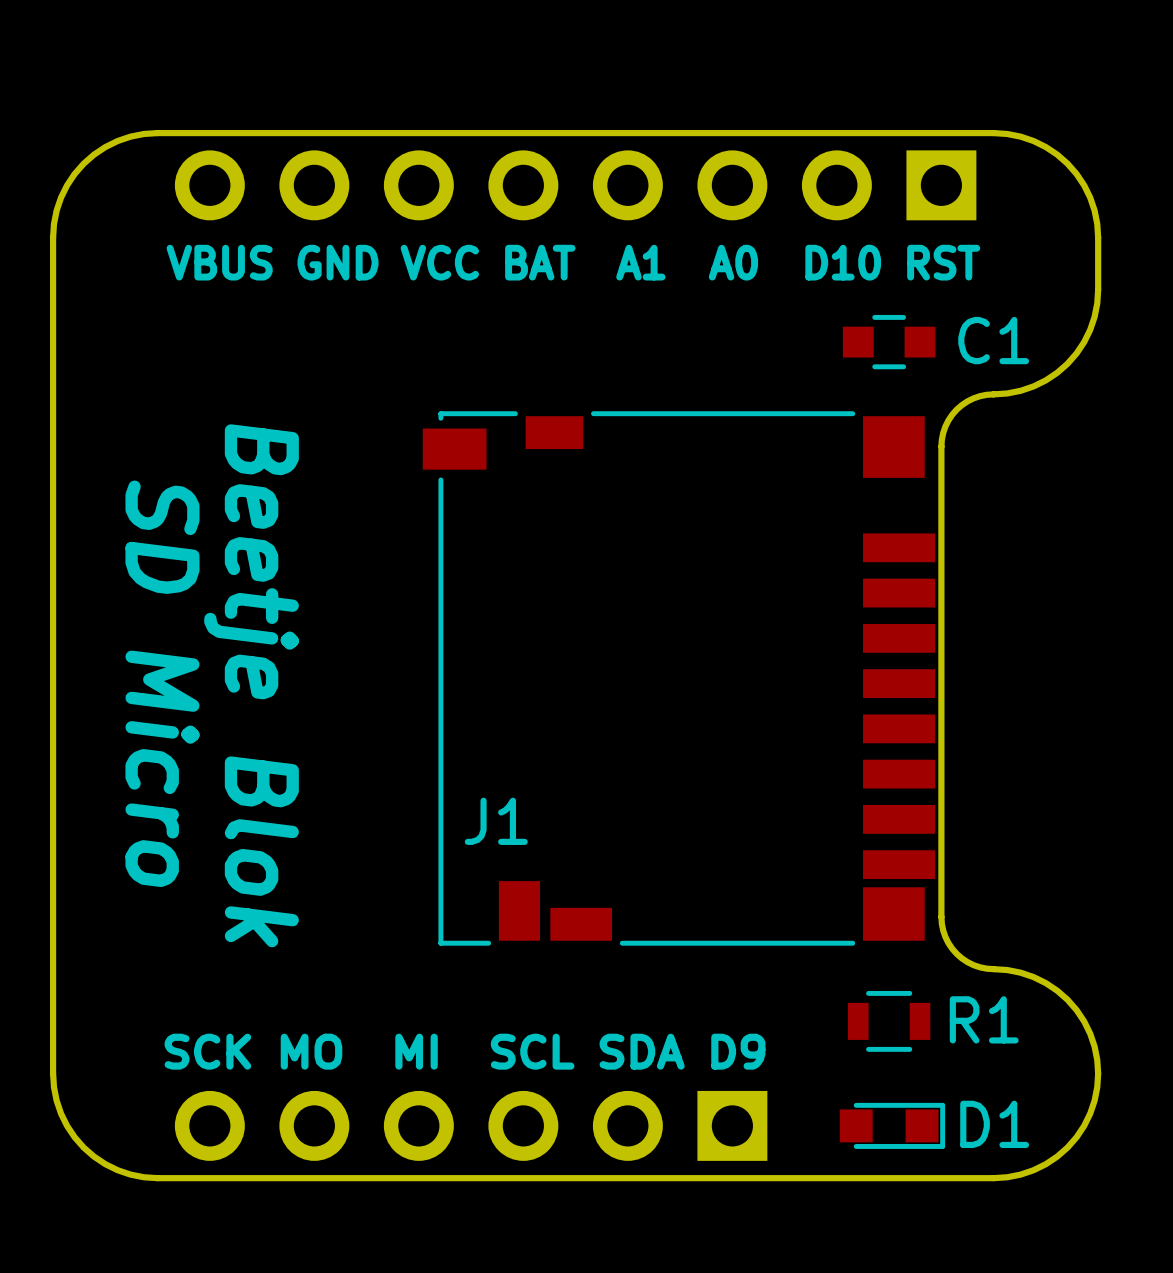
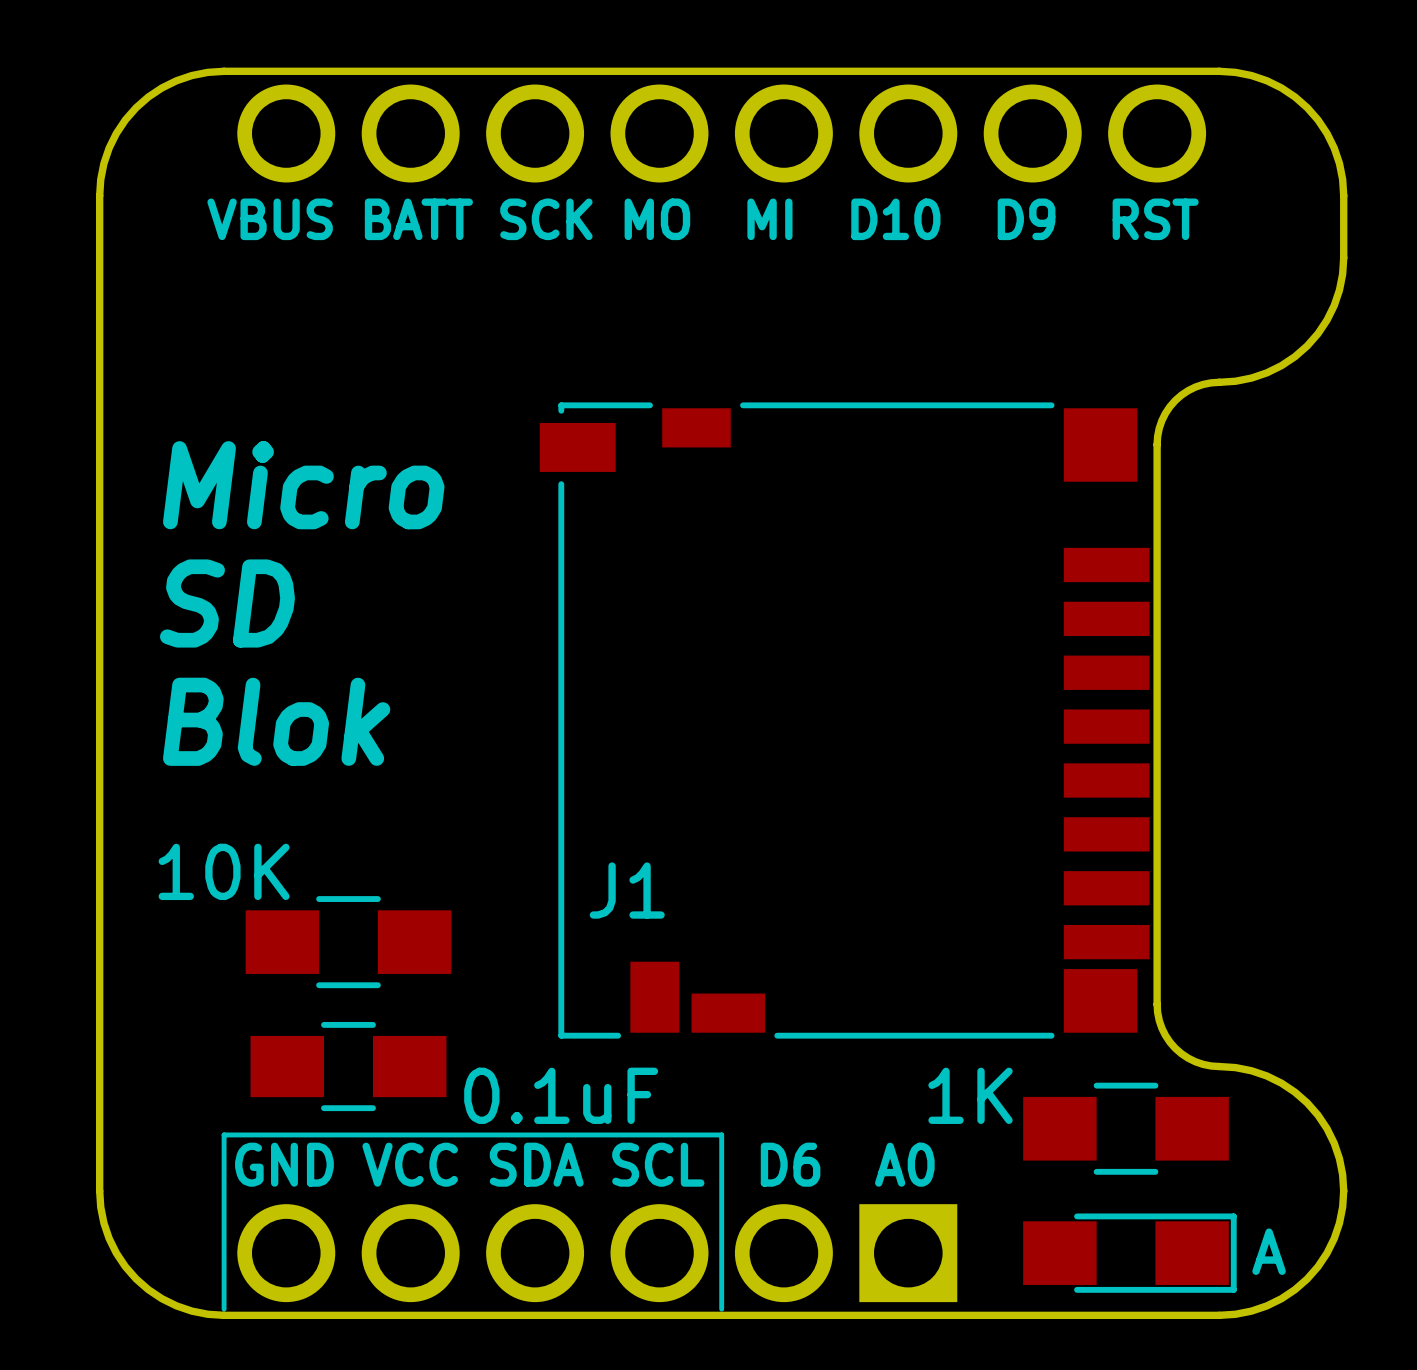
part footprint: [174, 150, 977, 221] -> [237, 84, 1207, 183]
text: VBUS GND VCC BAT A1 A0 D10 RST (573, 262) -> none
C1: (889, 342) -> none
text: none -> SD (227, 603)
text: none -> Blok (276, 721)
text: SD Micro (162, 683) -> Micro (303, 485)
text: Beetje Blok (251, 685) -> none
part: none -> 10K (348, 942)
part: none -> 0.1uF (348, 1066)
R1: (889, 1021) -> none
part: none -> 1K (1126, 1128)
text: SCK MO MI SCL SDA D9 (465, 1051) -> none
part footprint: [174, 1090, 768, 1161] -> [221, 1132, 958, 1312]
text: none -> A (1269, 1251)
D1: (892, 1125) -> none
part: none -> (1129, 1253)

